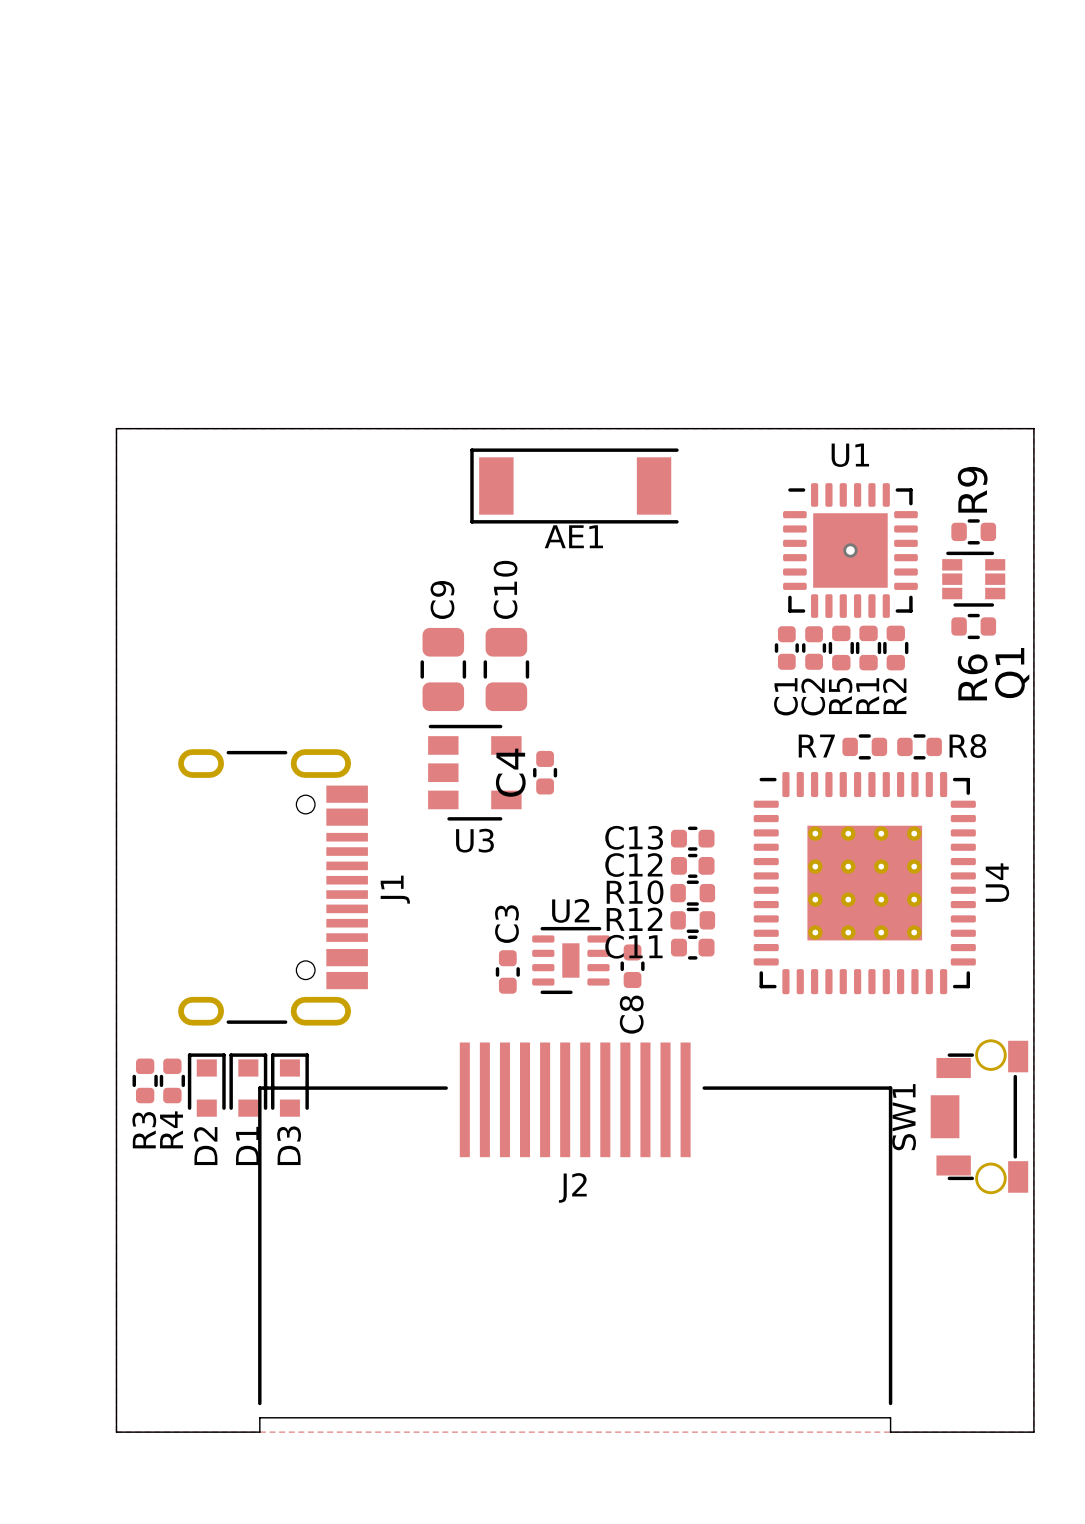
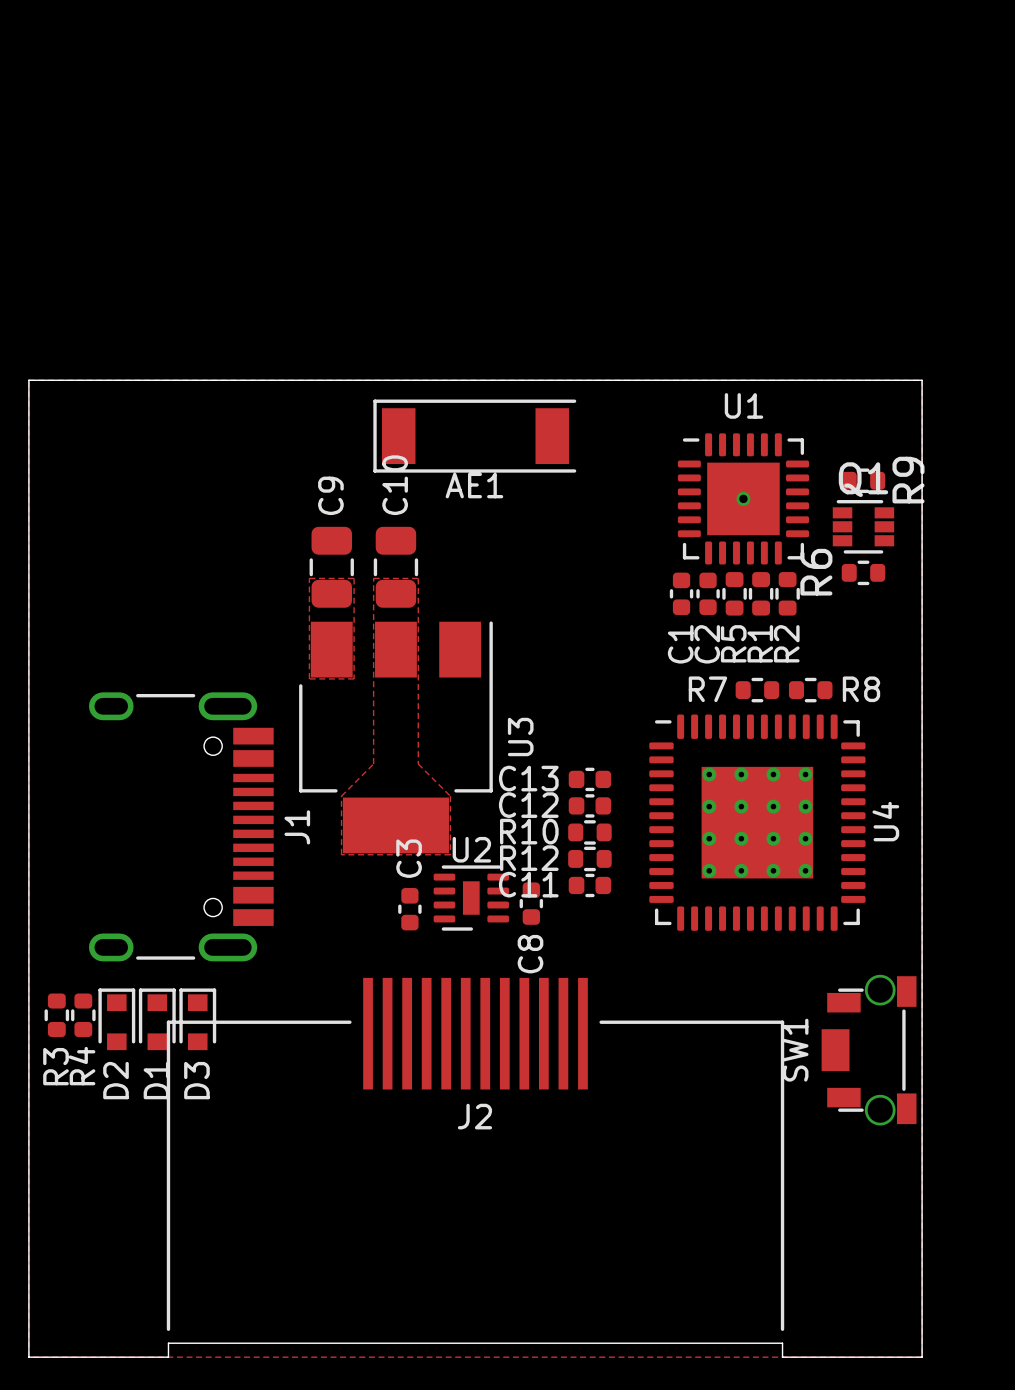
R9 name position: R9 (972, 489) -> R9 (908, 480)
zone outline: none -> (309, 578) (354, 578) (354, 678) (309, 678) (309, 578)
zone outline: none -> (373, 578) (373, 764) (341, 796) (341, 854) (450, 854) (450, 796) (418, 764) (418, 578) (373, 578)
C9 position: (443, 669) -> (331, 567)
C10 position: (506, 669) -> (395, 567)
Q1 name rotation: 0° (1012, 673) -> 90° clockwise (863, 479)
Q1 name position: Q1 (1012, 673) -> Q1 (863, 479)
R6 name position: R6 (972, 677) -> R6 (816, 572)
U3 footprint: [428, 724, 522, 821] -> [299, 621, 493, 854]
C4: (545, 772) -> none
U3 name position: U3 (474, 840) -> U3 (520, 737)

